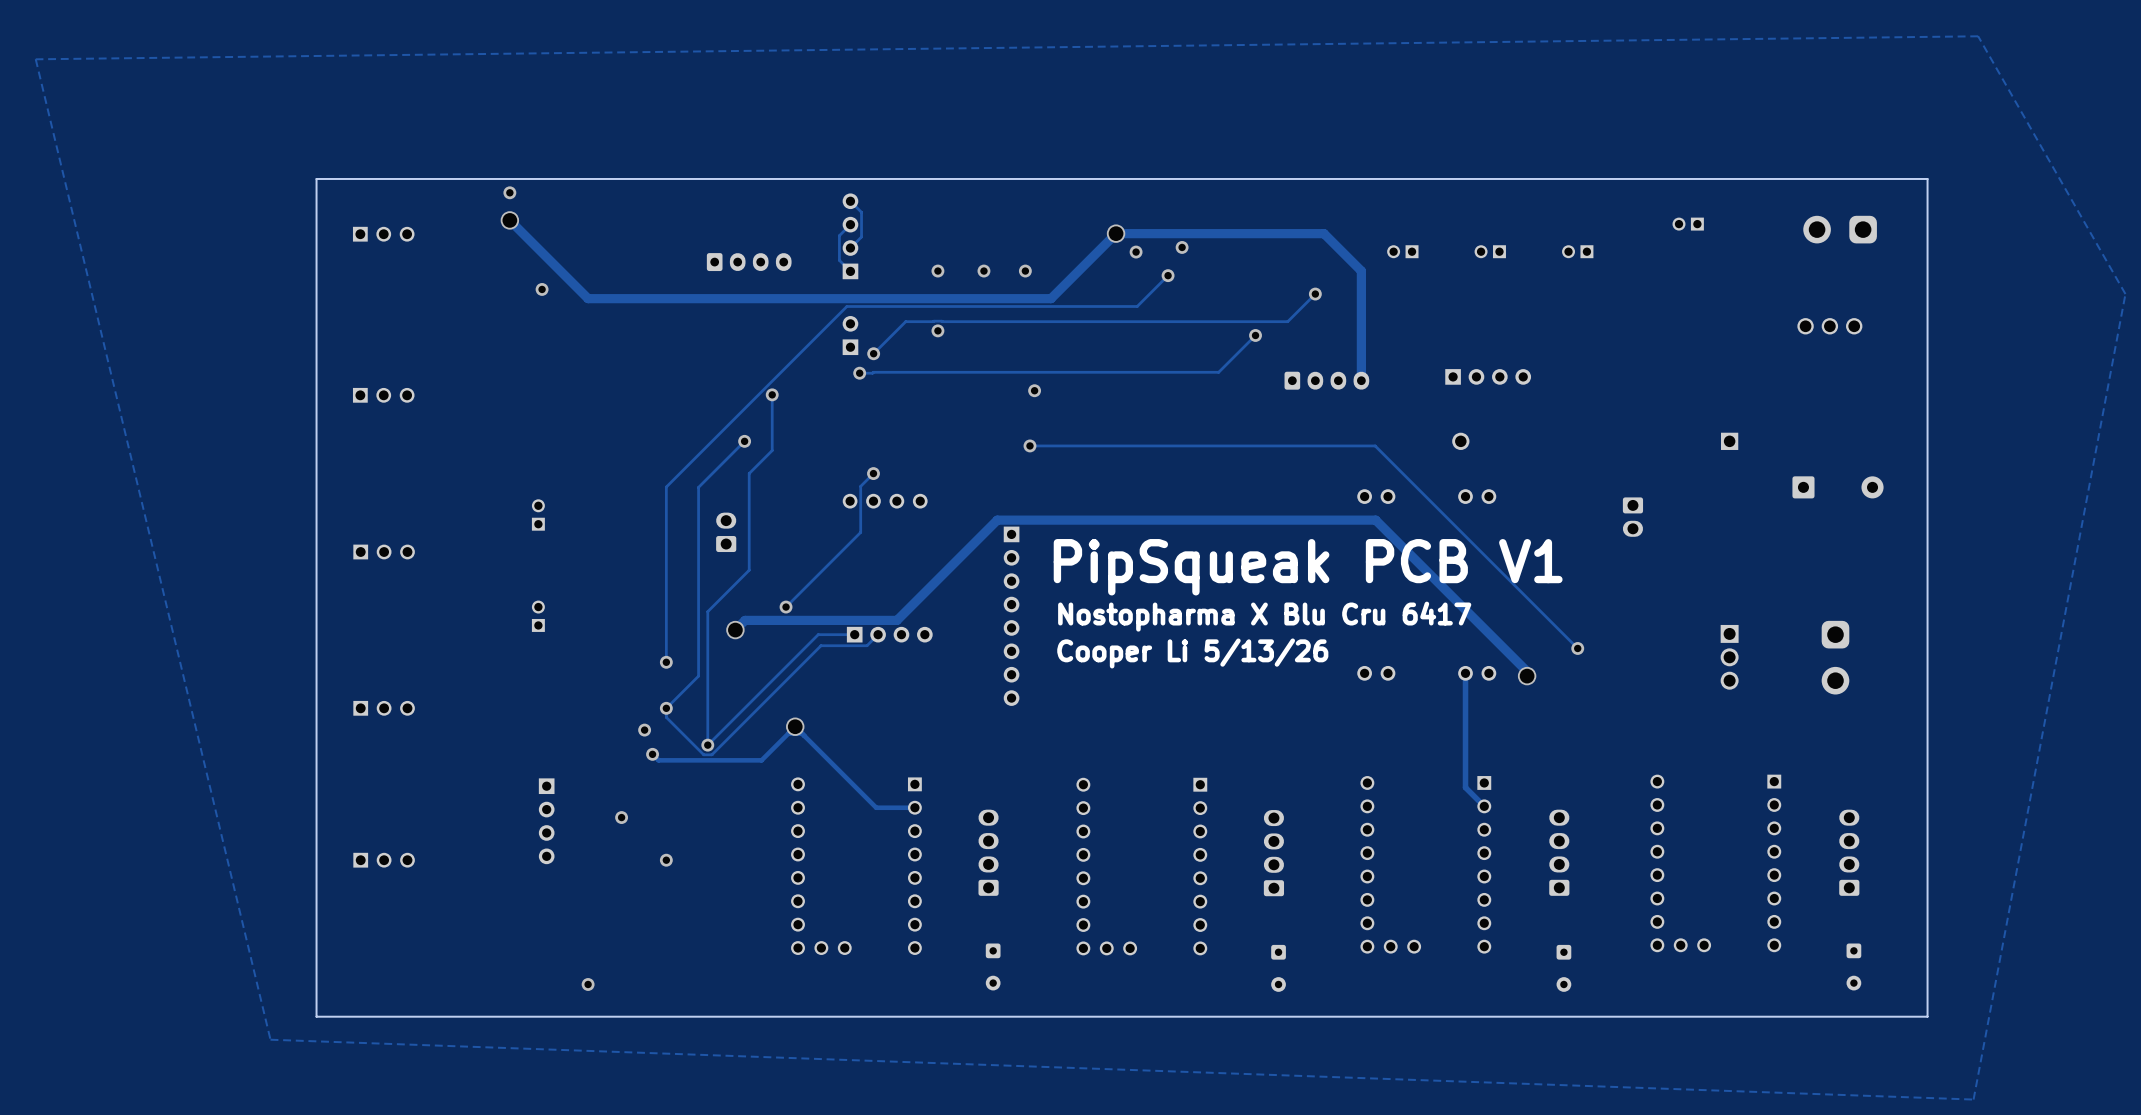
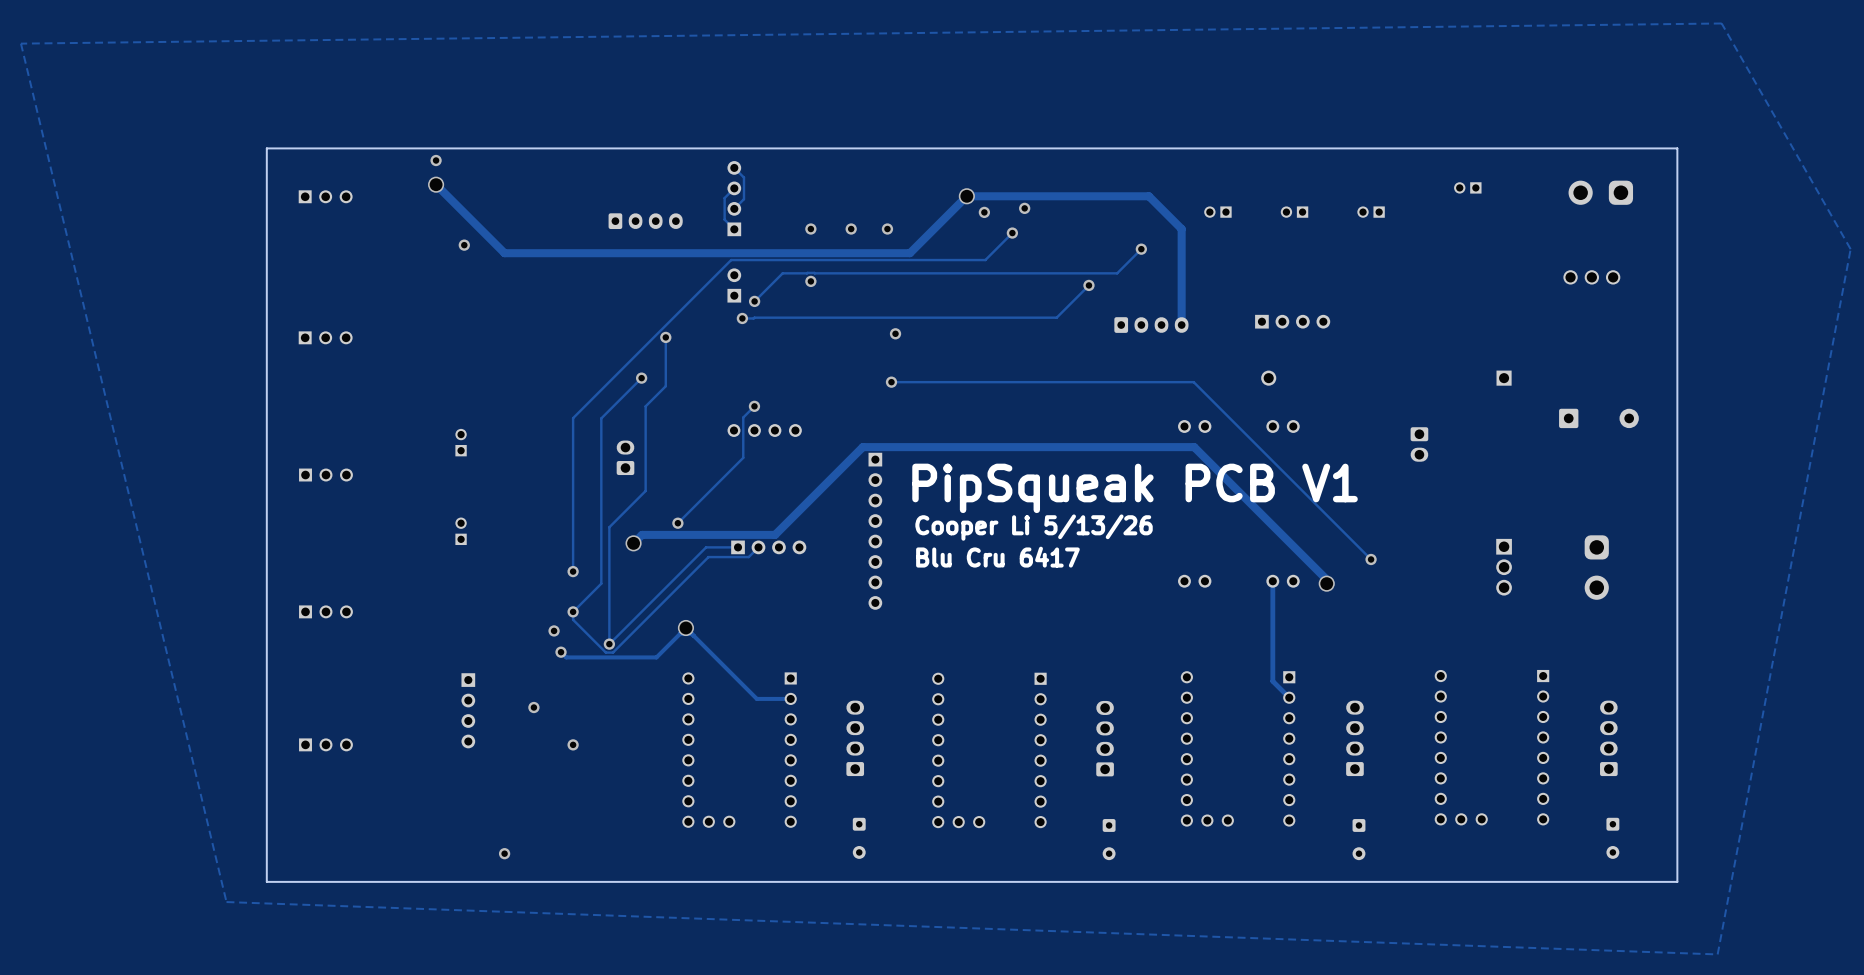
text: Nostopharma X Blu Cru 6417 (1264, 616) -> Cooper Li 5/13/26 (1034, 527)
text: Cooper Li 5/13/26 (1192, 653) -> Blu Cru 6417 (997, 557)

